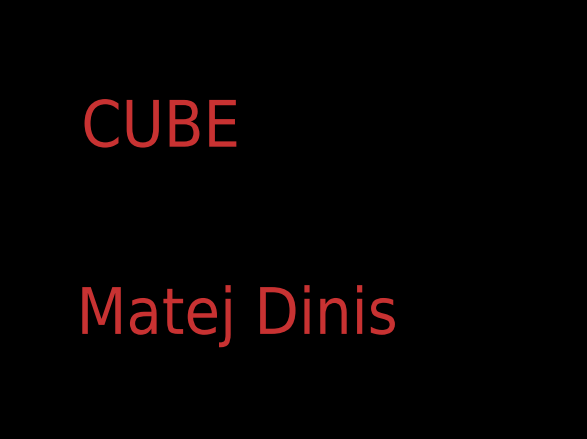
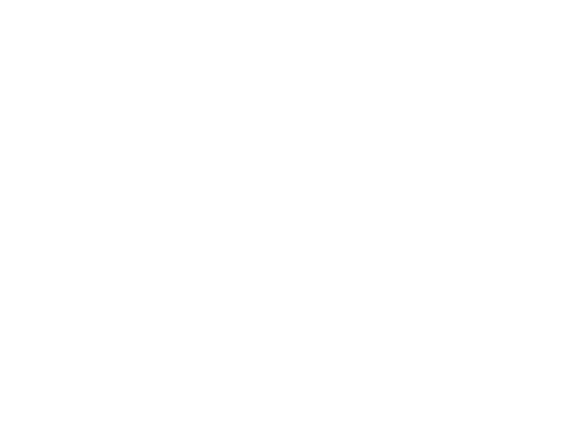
text: CUBE (160, 123) -> none
text: Matej Dinis (238, 316) -> none

